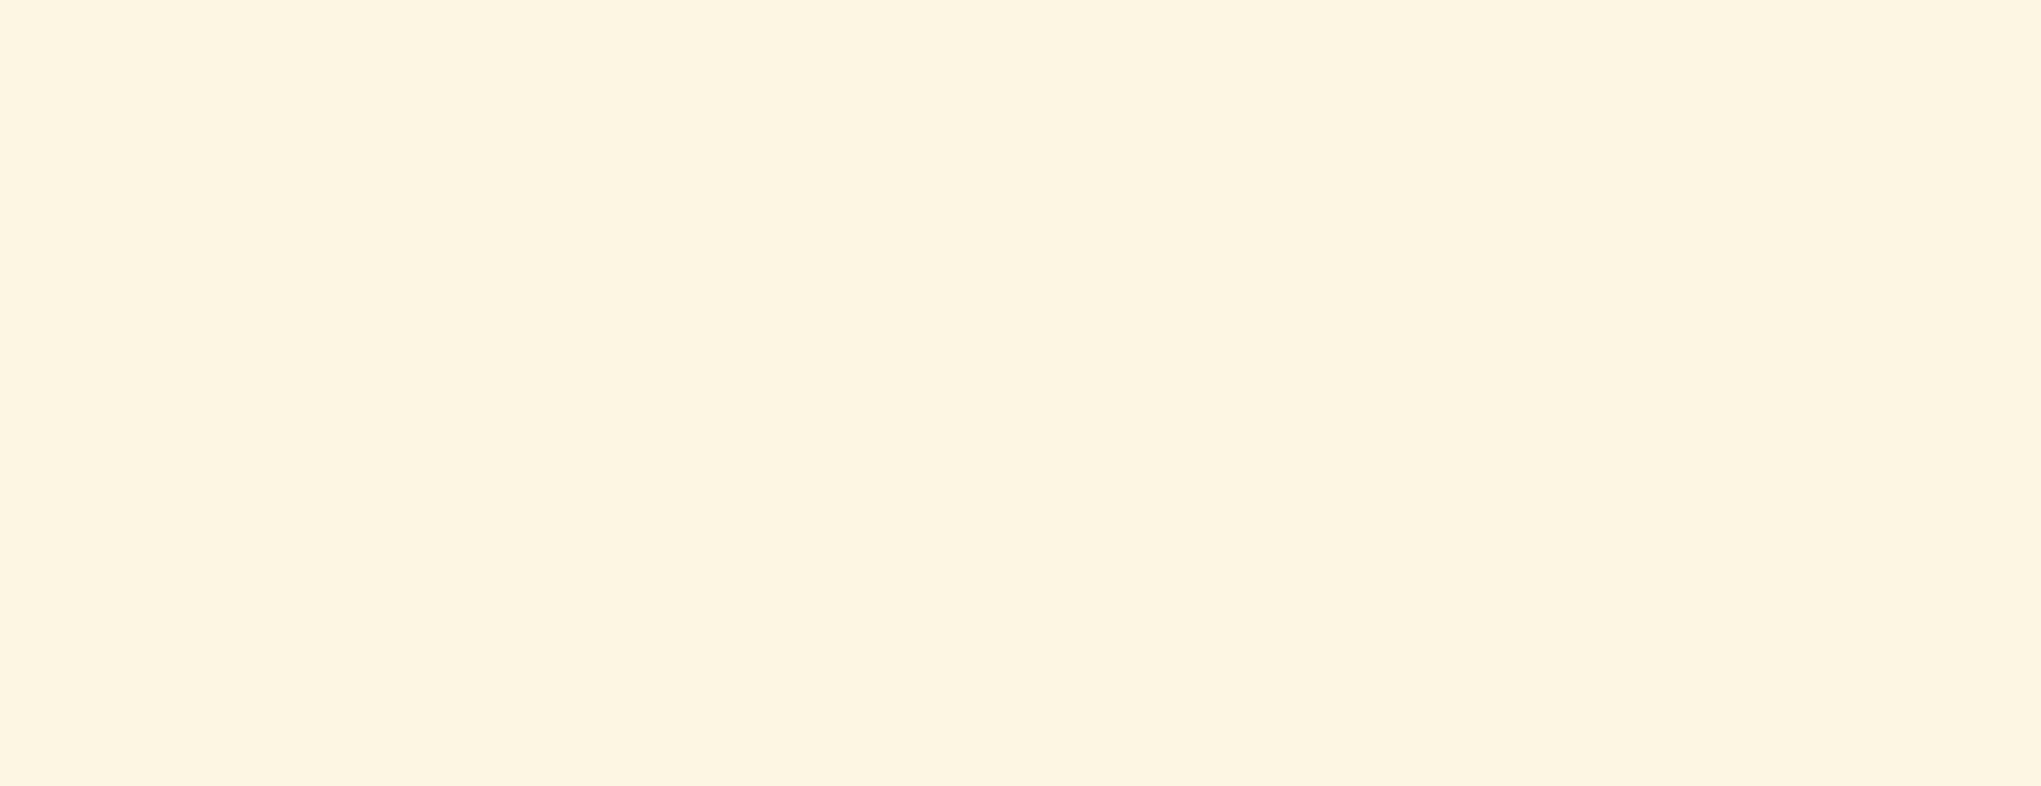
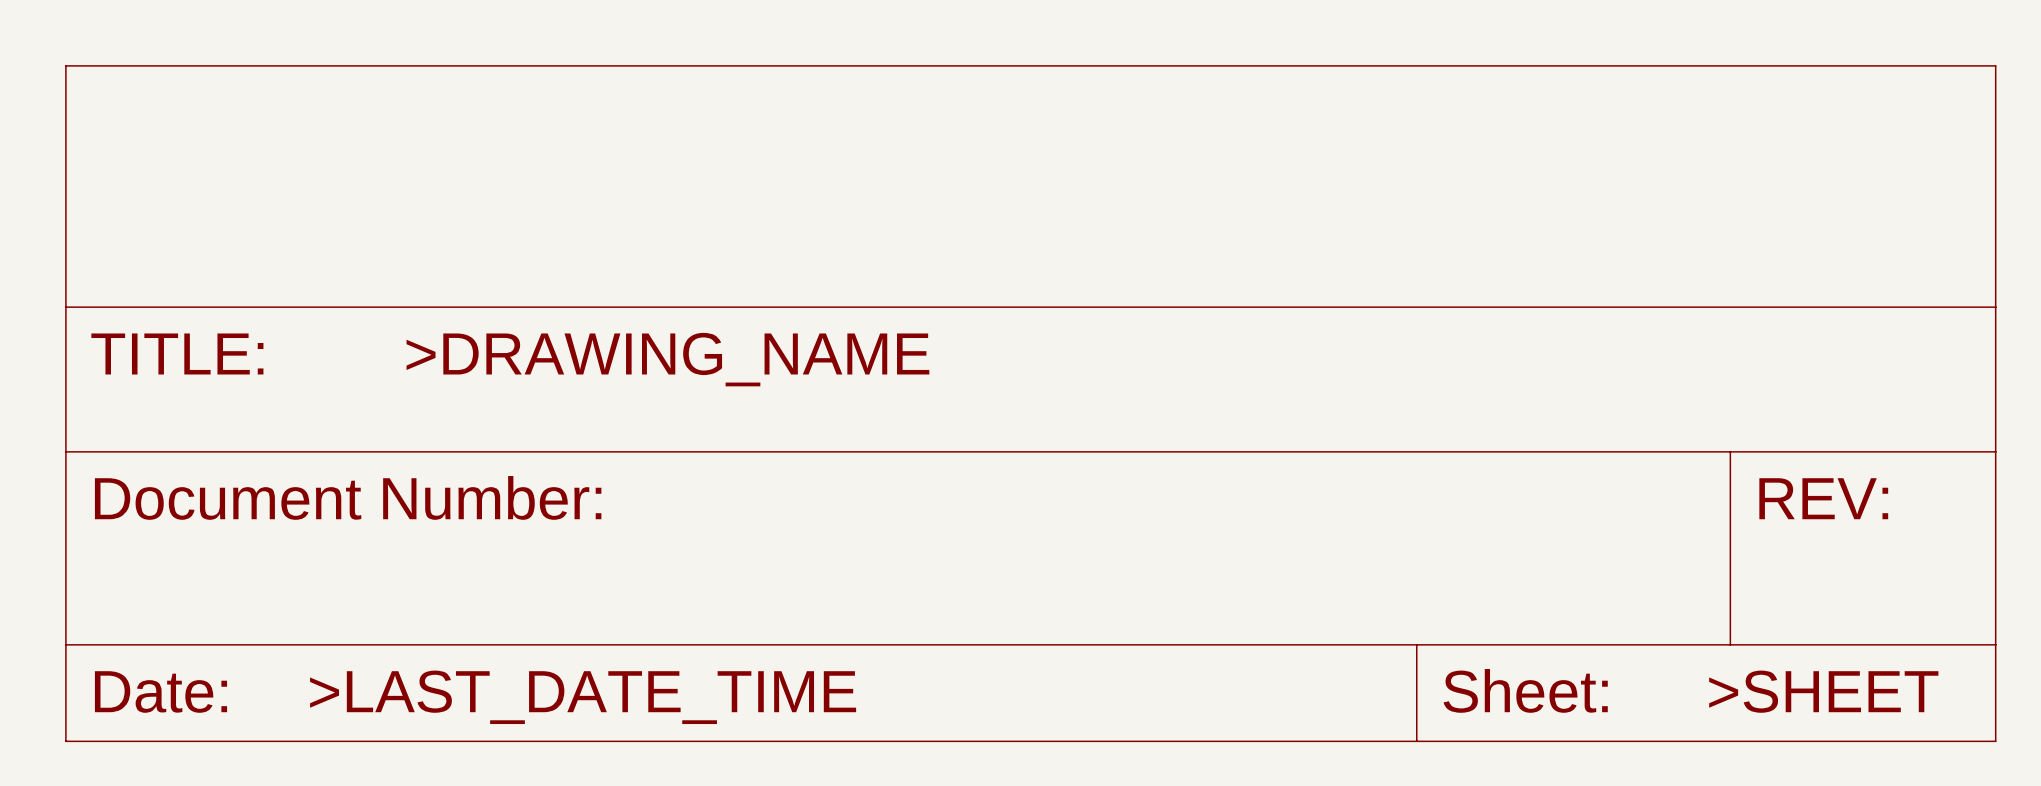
power symbol: none -> (1030, 403)

